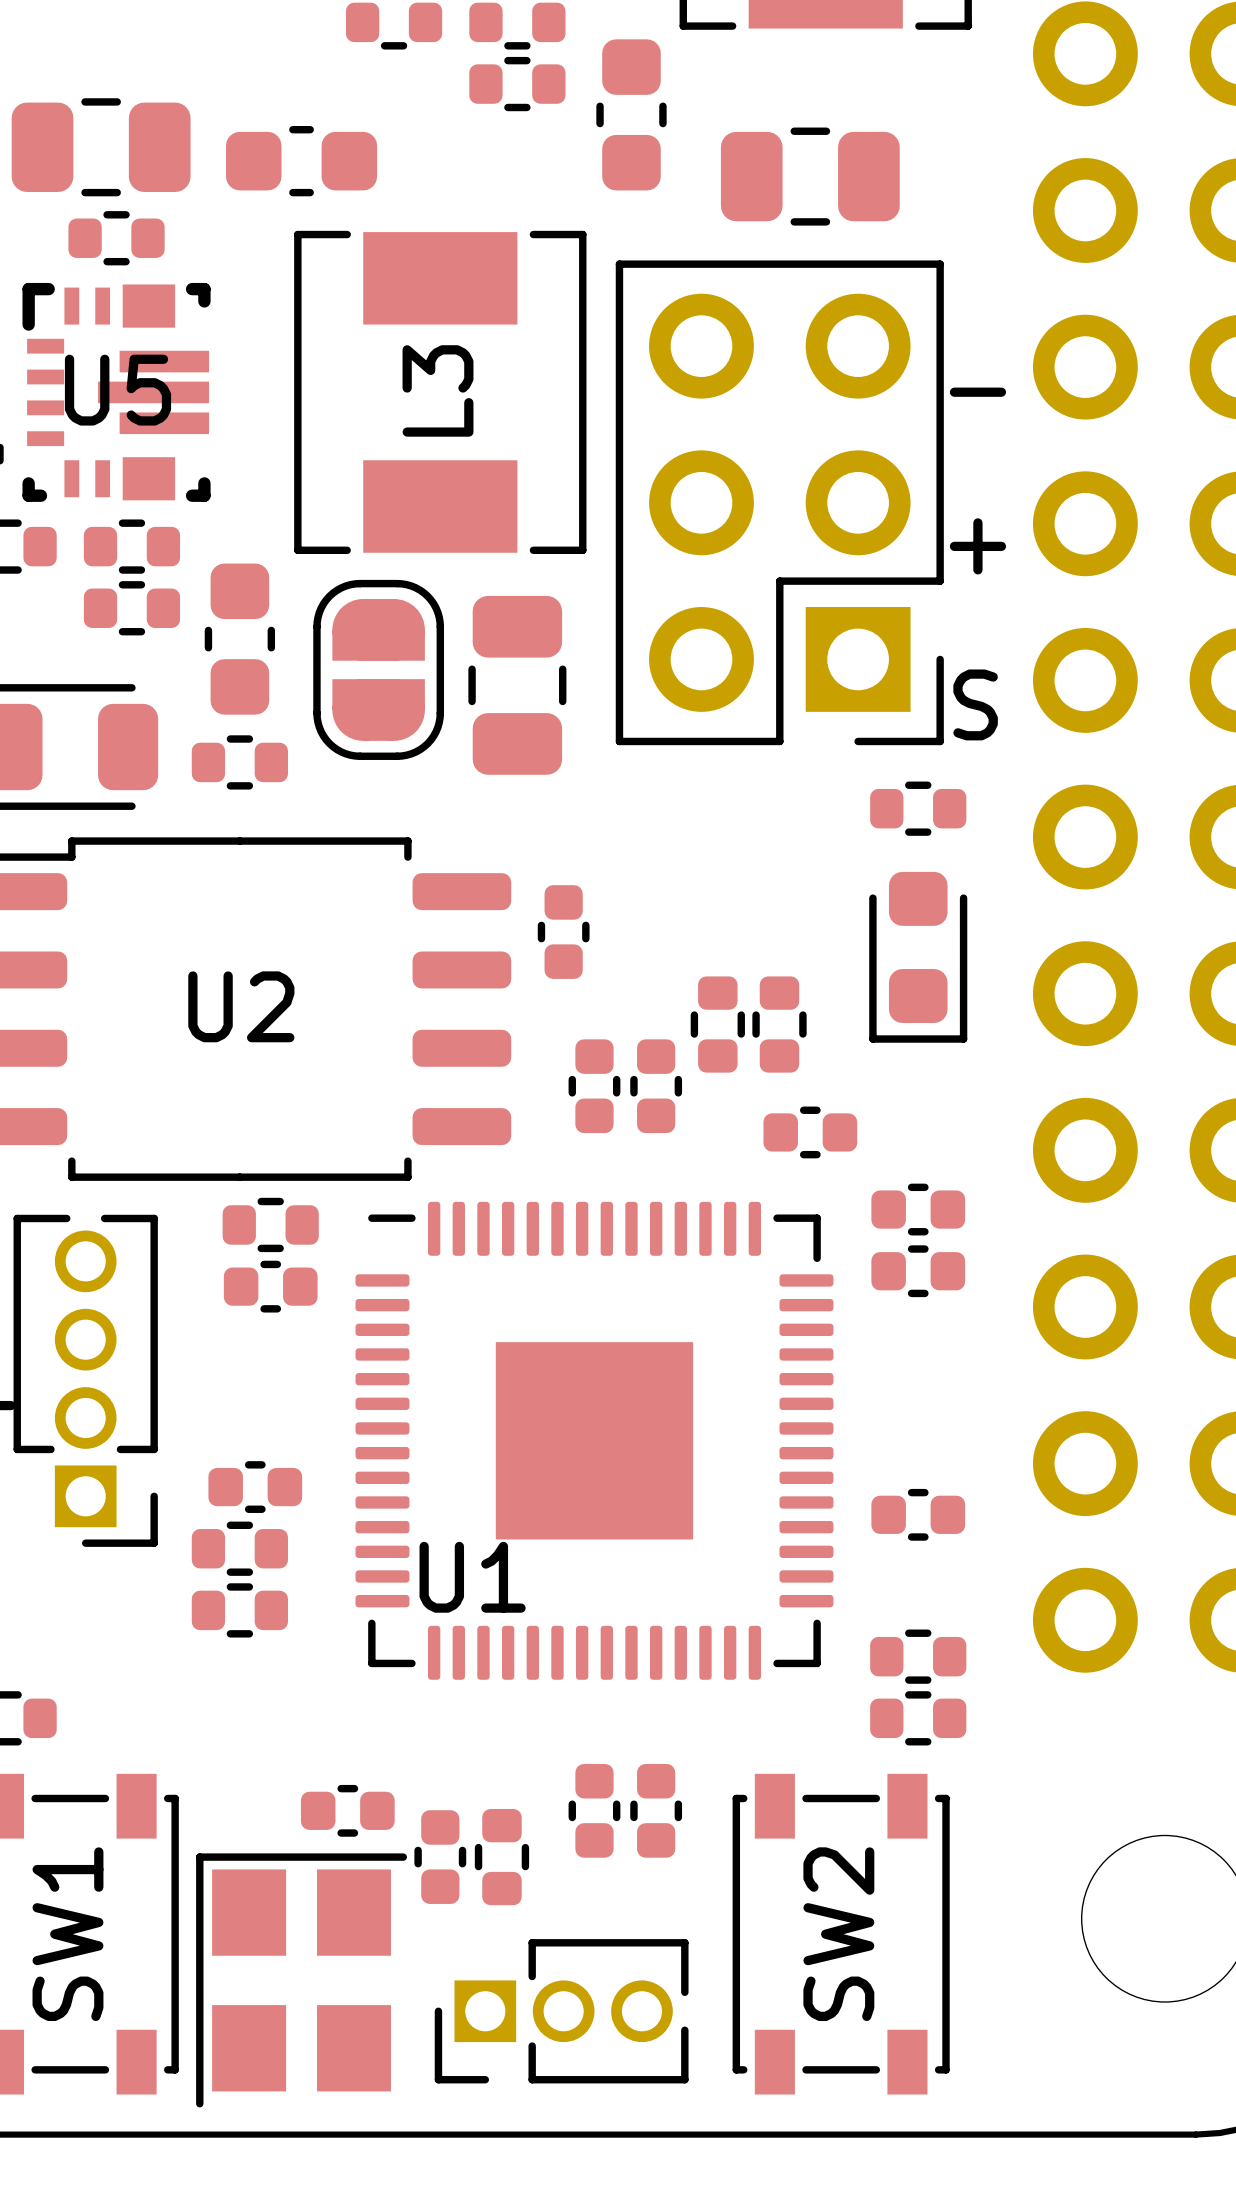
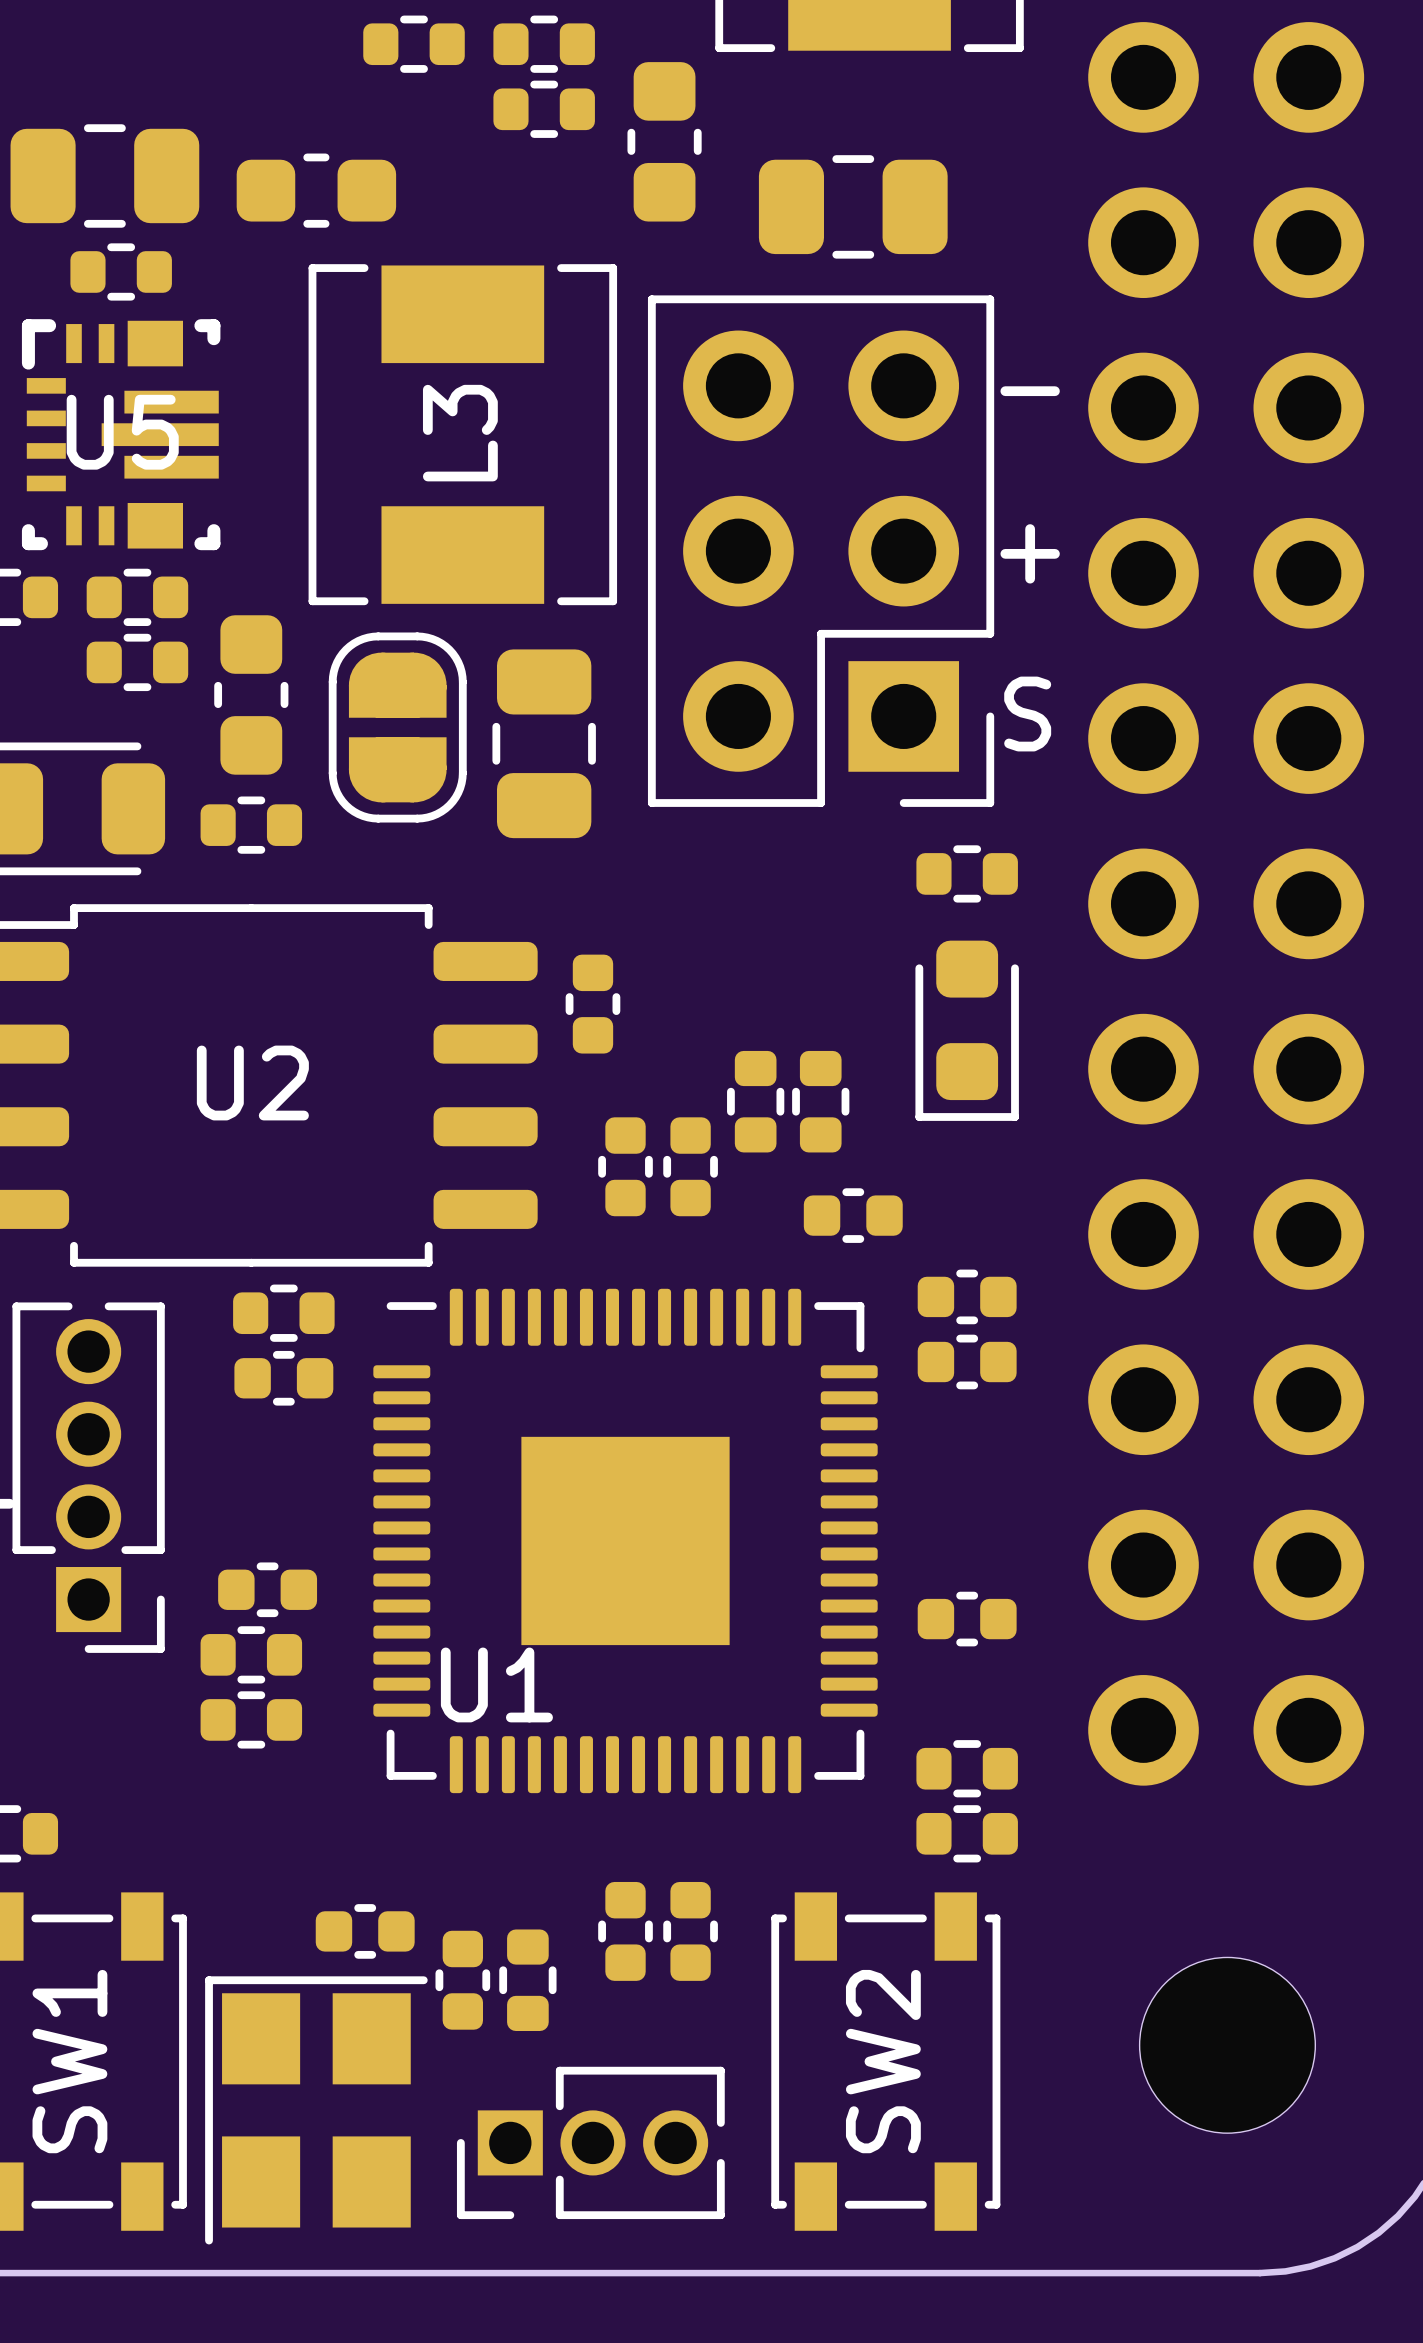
text position: - (977, 392) -> - (1030, 391)
text position: + (977, 546) -> + (1030, 553)
text position: S (975, 704) -> S (1027, 714)

